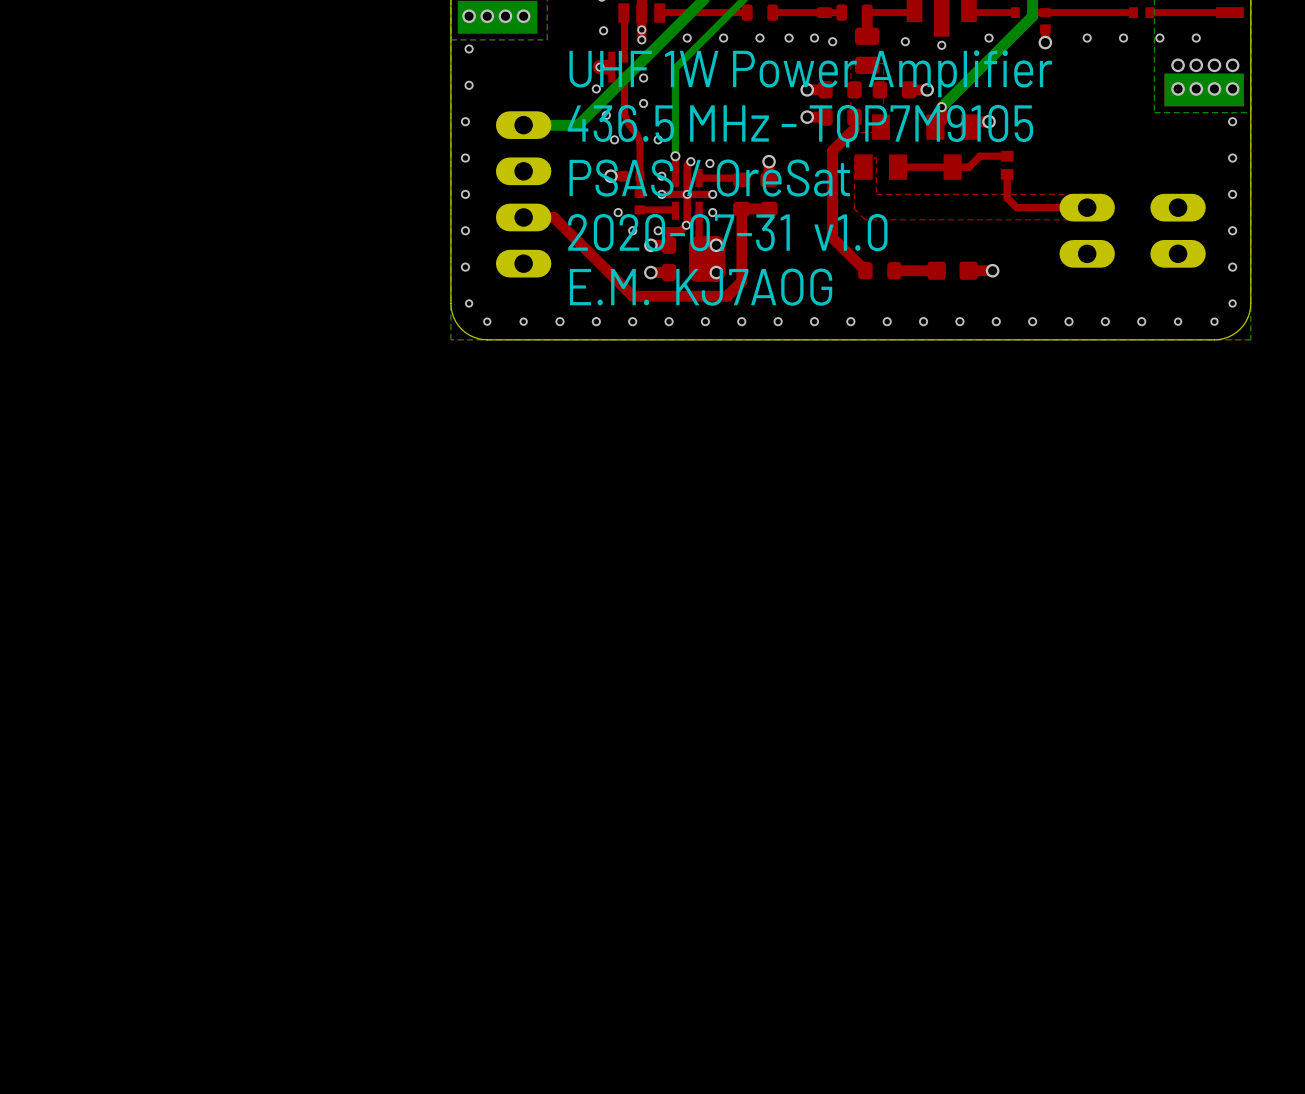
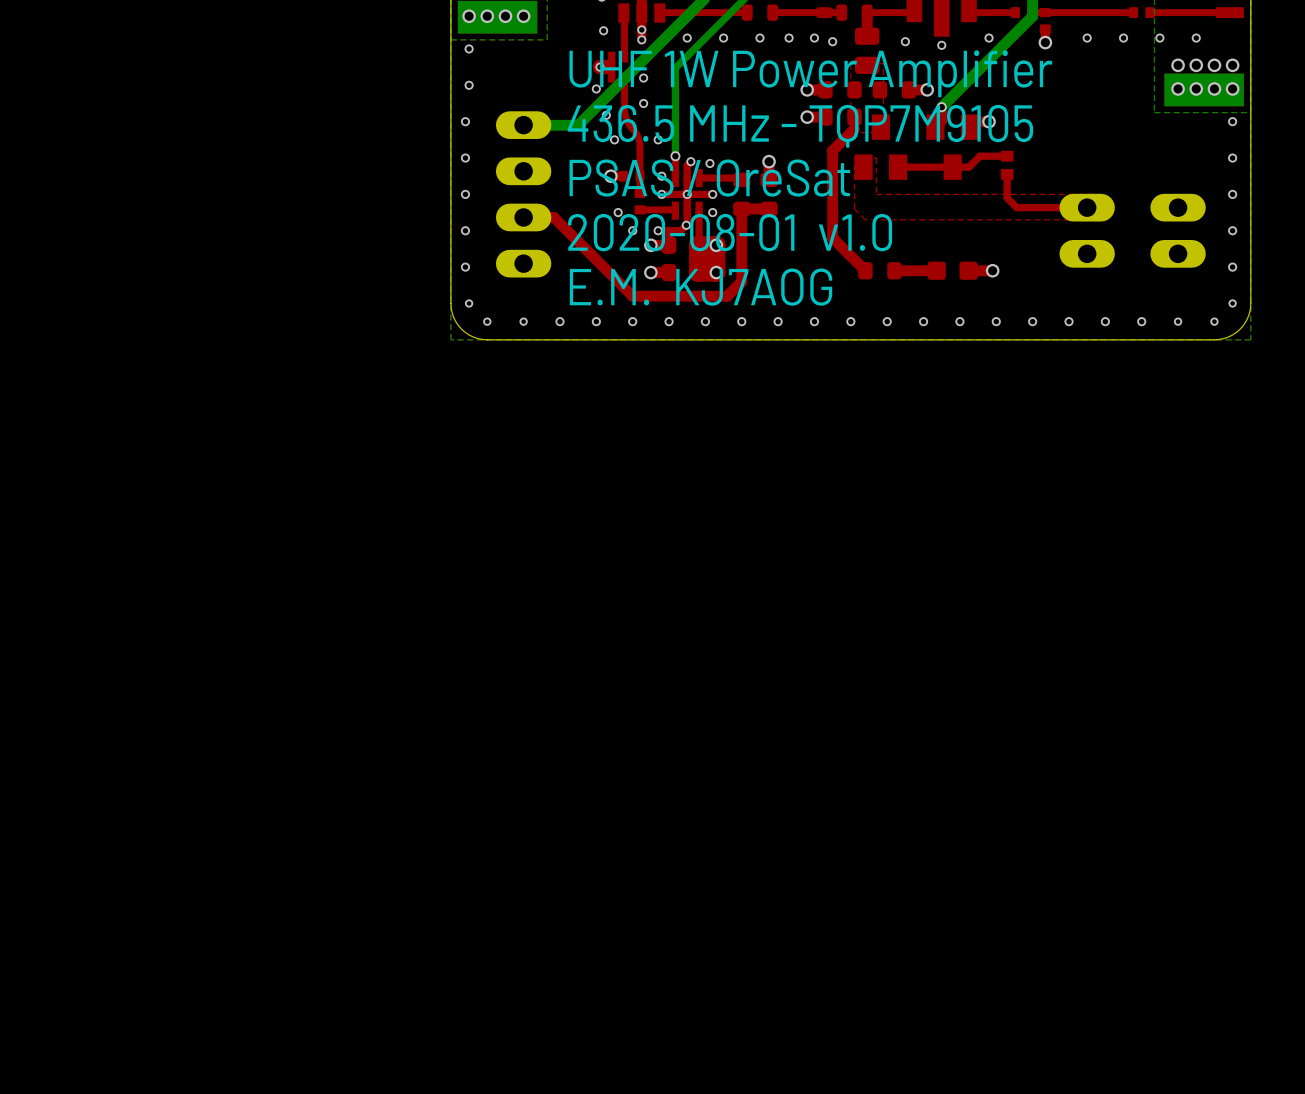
text: 2020-07-31 v1.0 (727, 232) -> 2020-08-01 v1.0 (730, 232)

